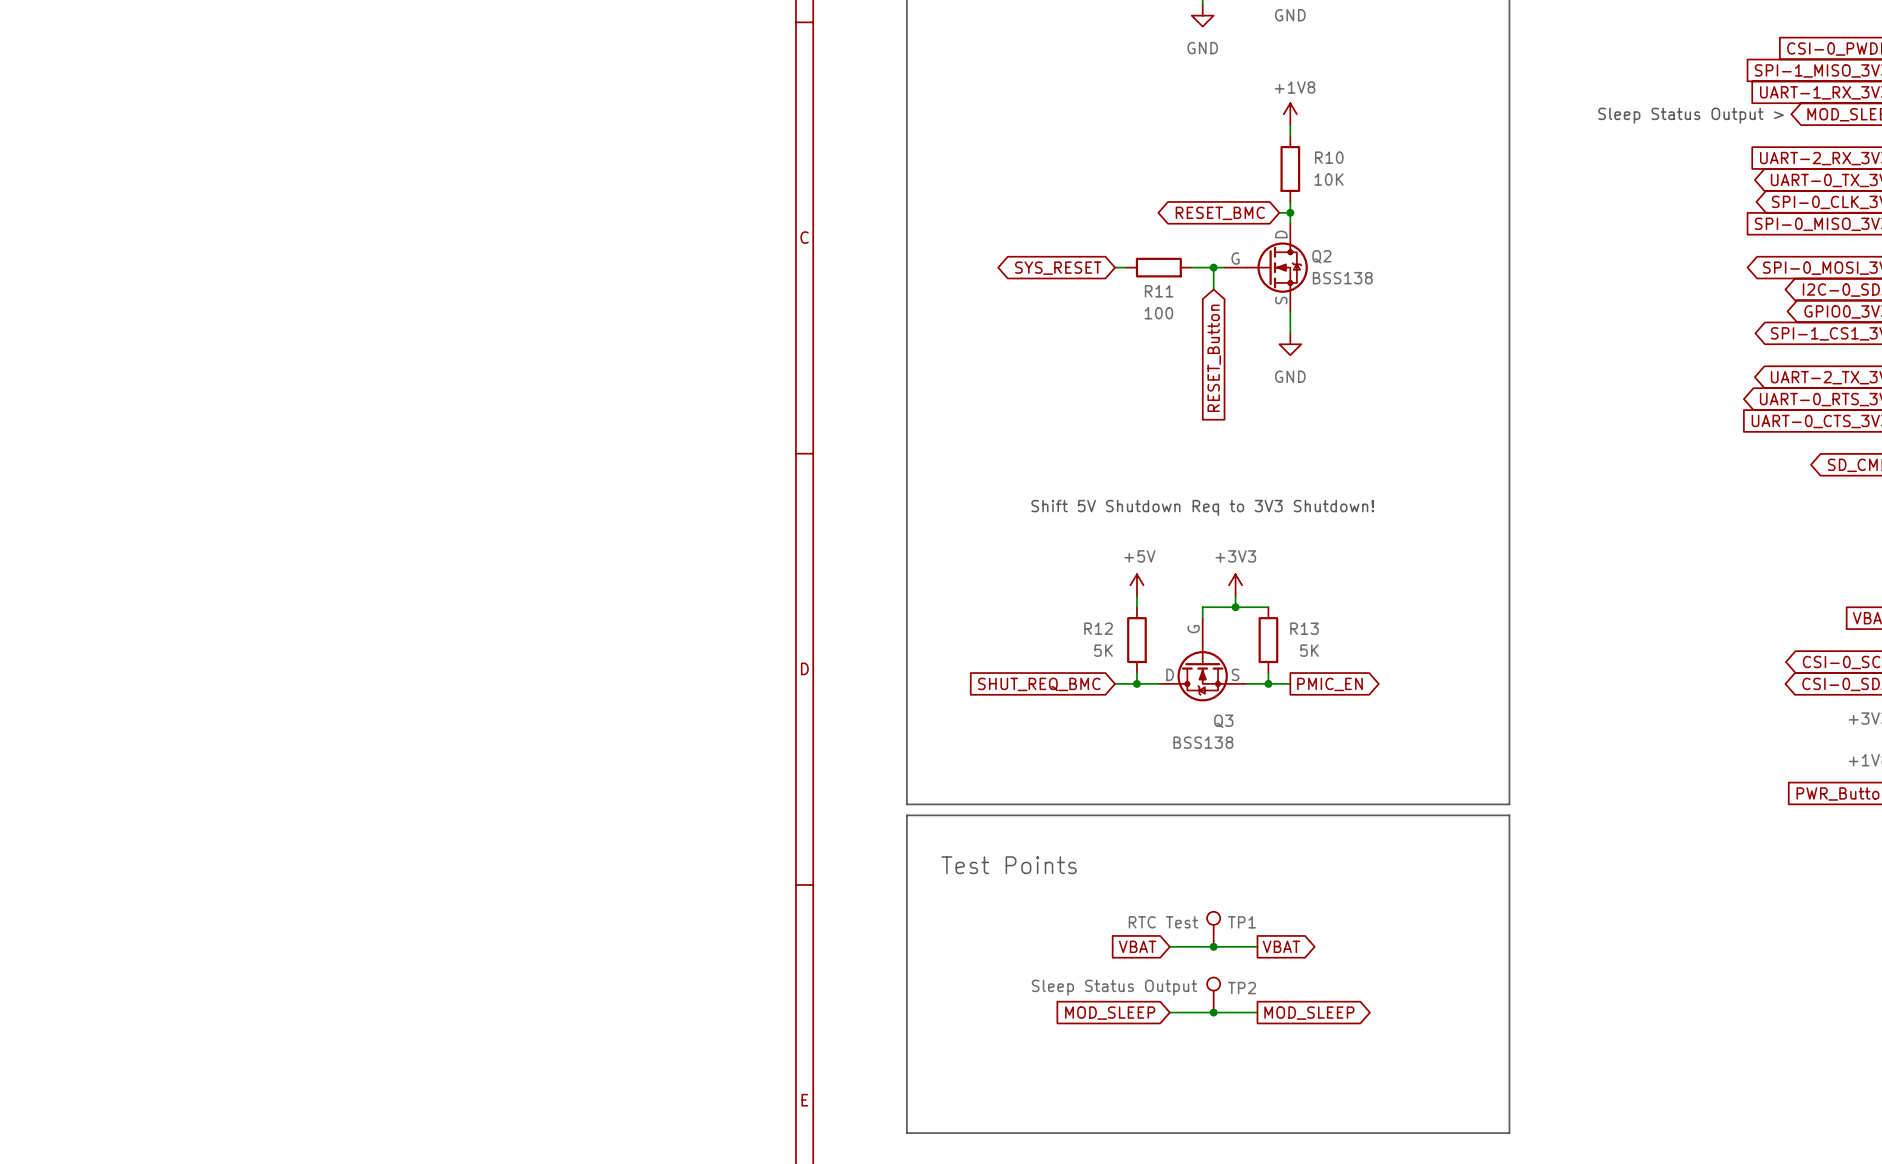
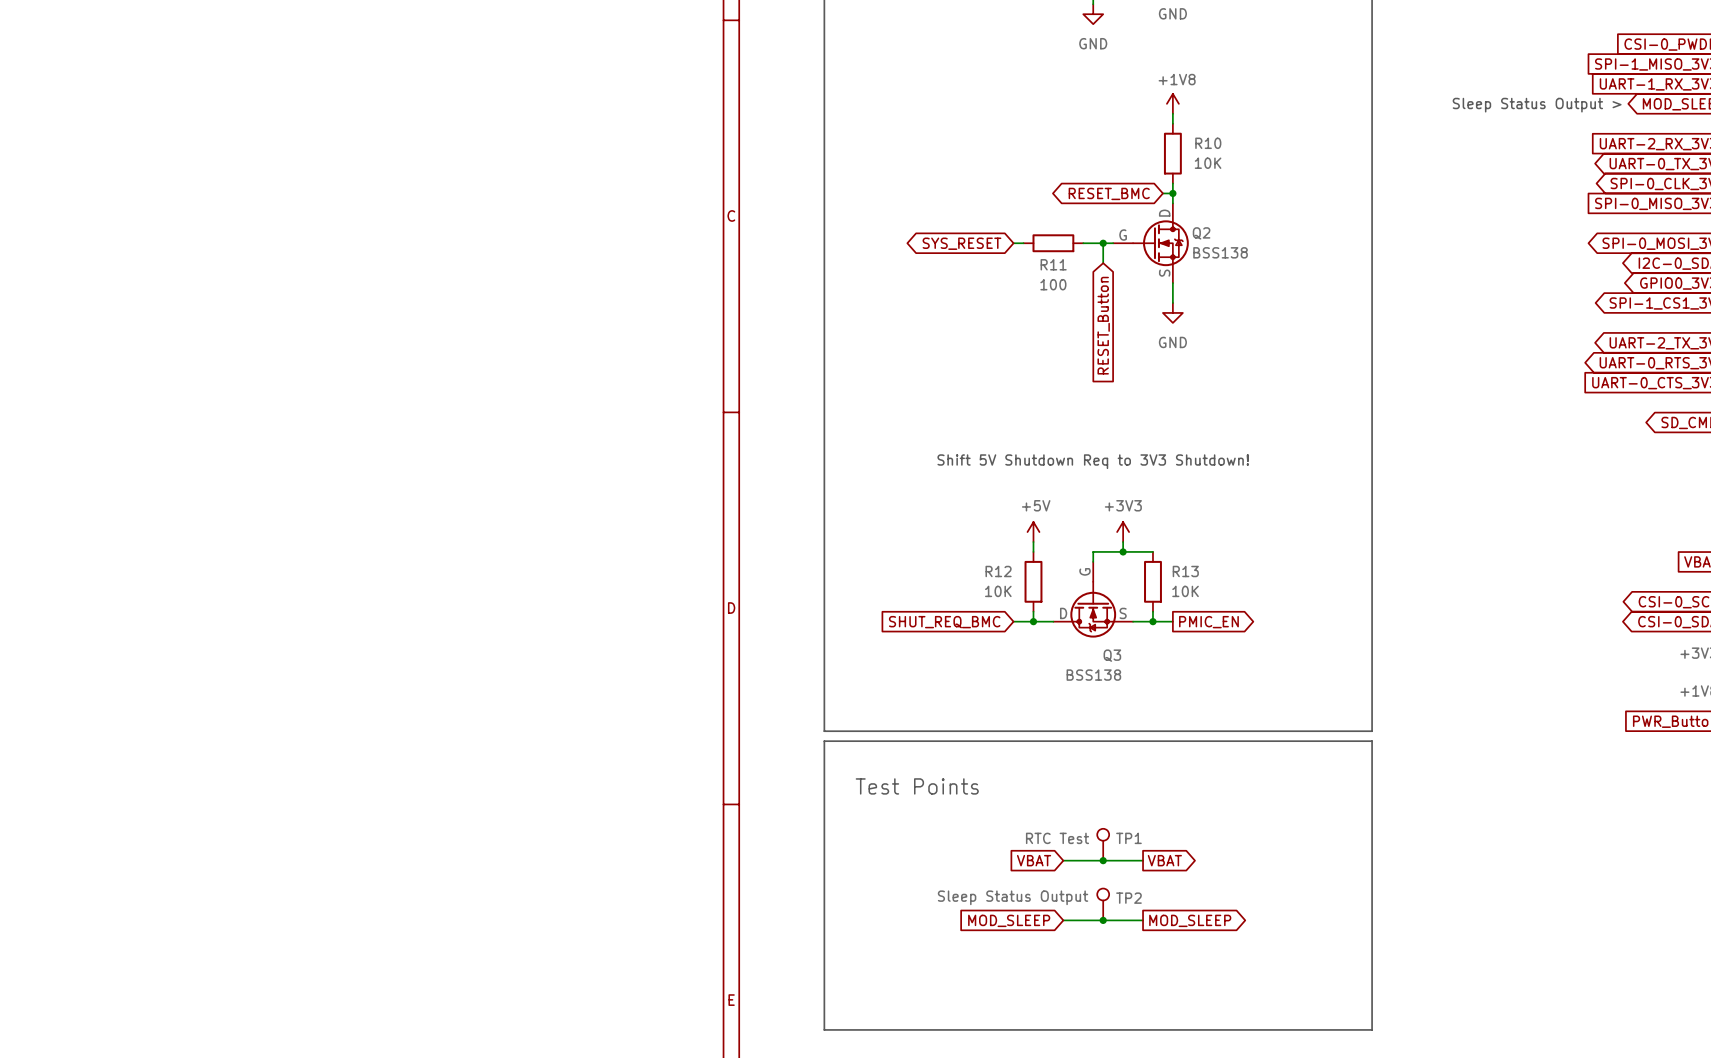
R12 value: 5K (1103, 650) -> 10K (998, 591)
R13 value: 5K (1309, 650) -> 10K (1185, 591)

